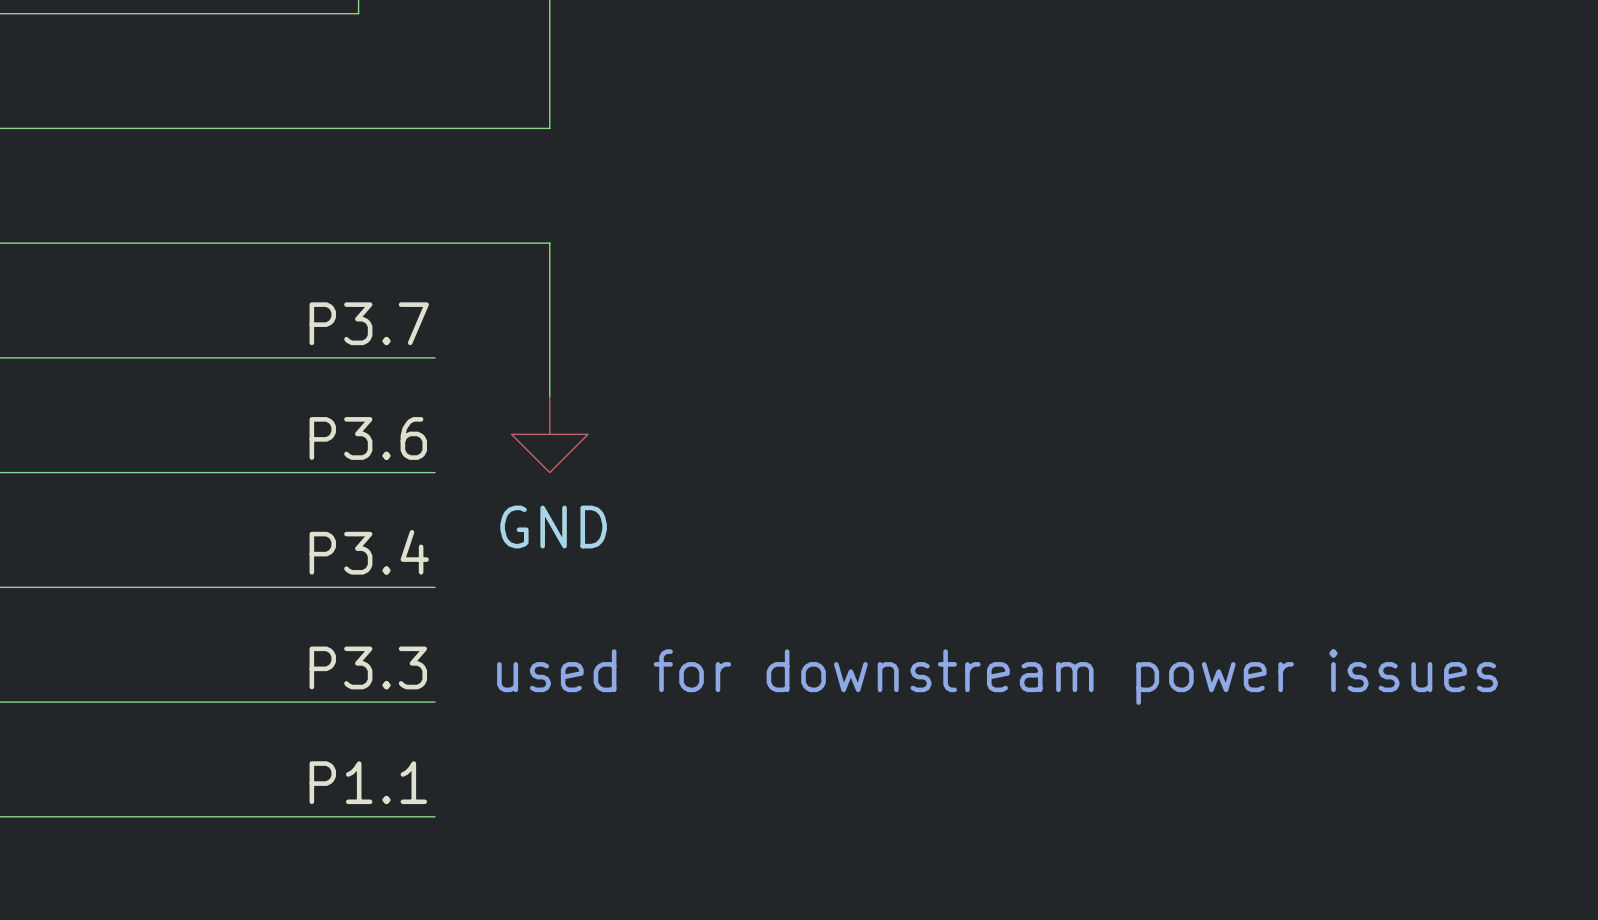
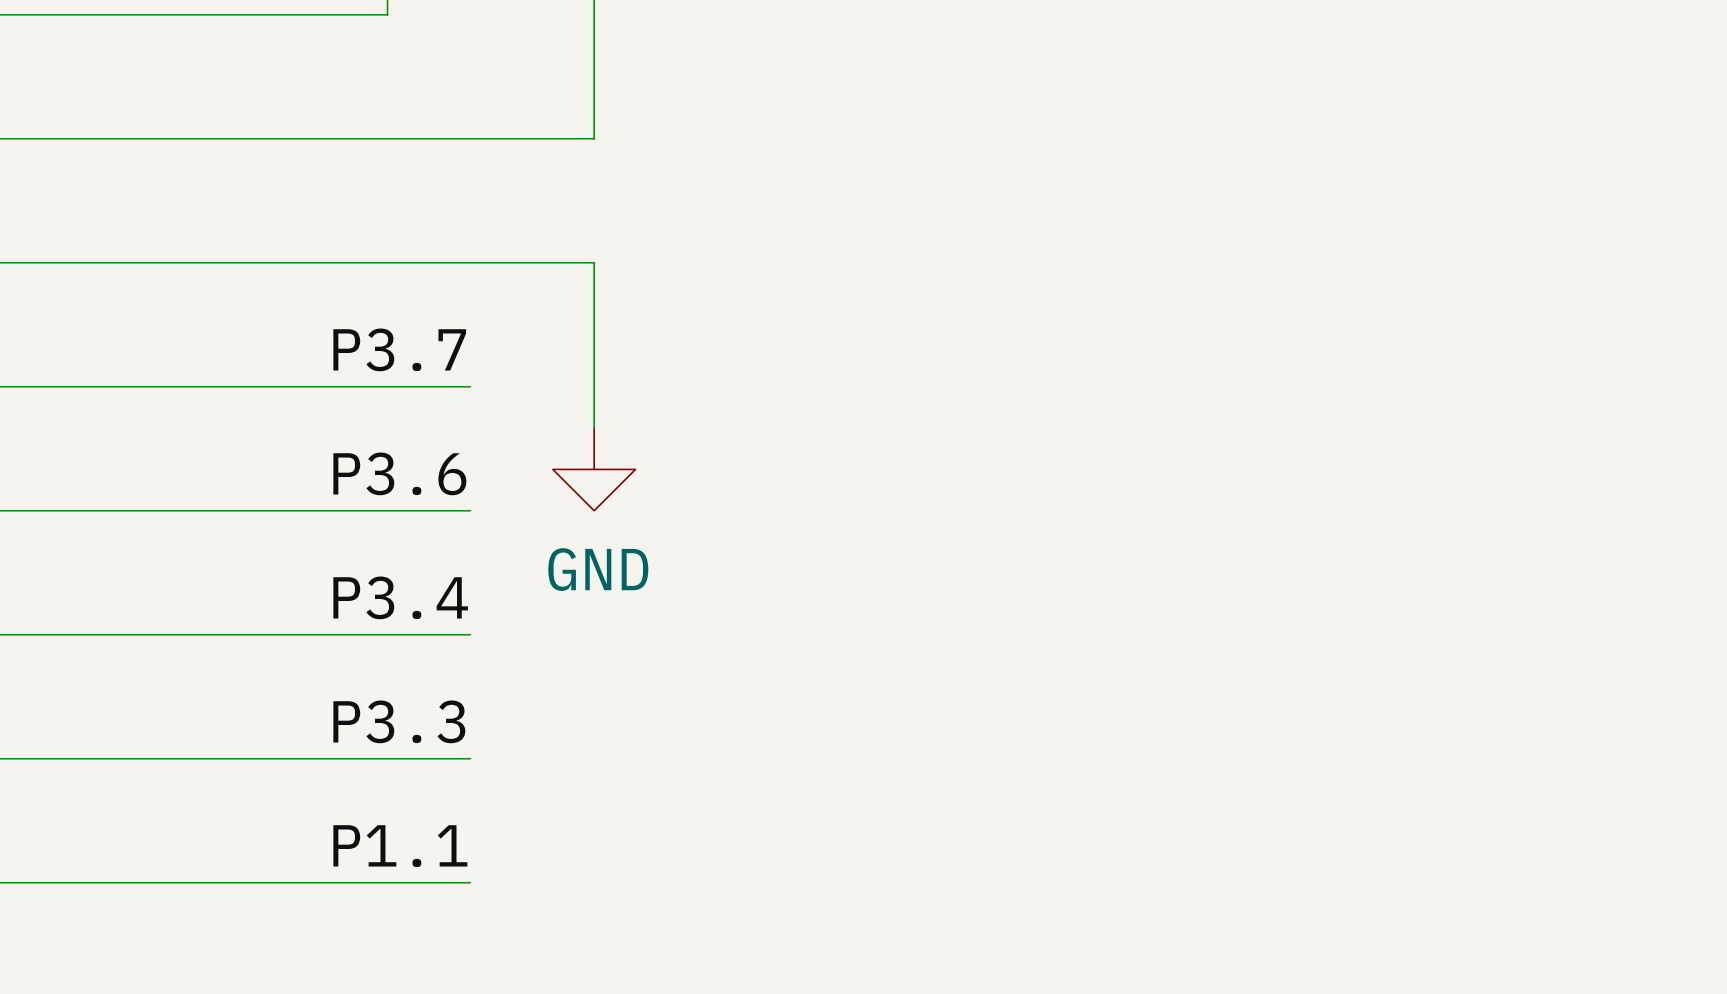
text: used for downstream power issues (997, 677) -> none

